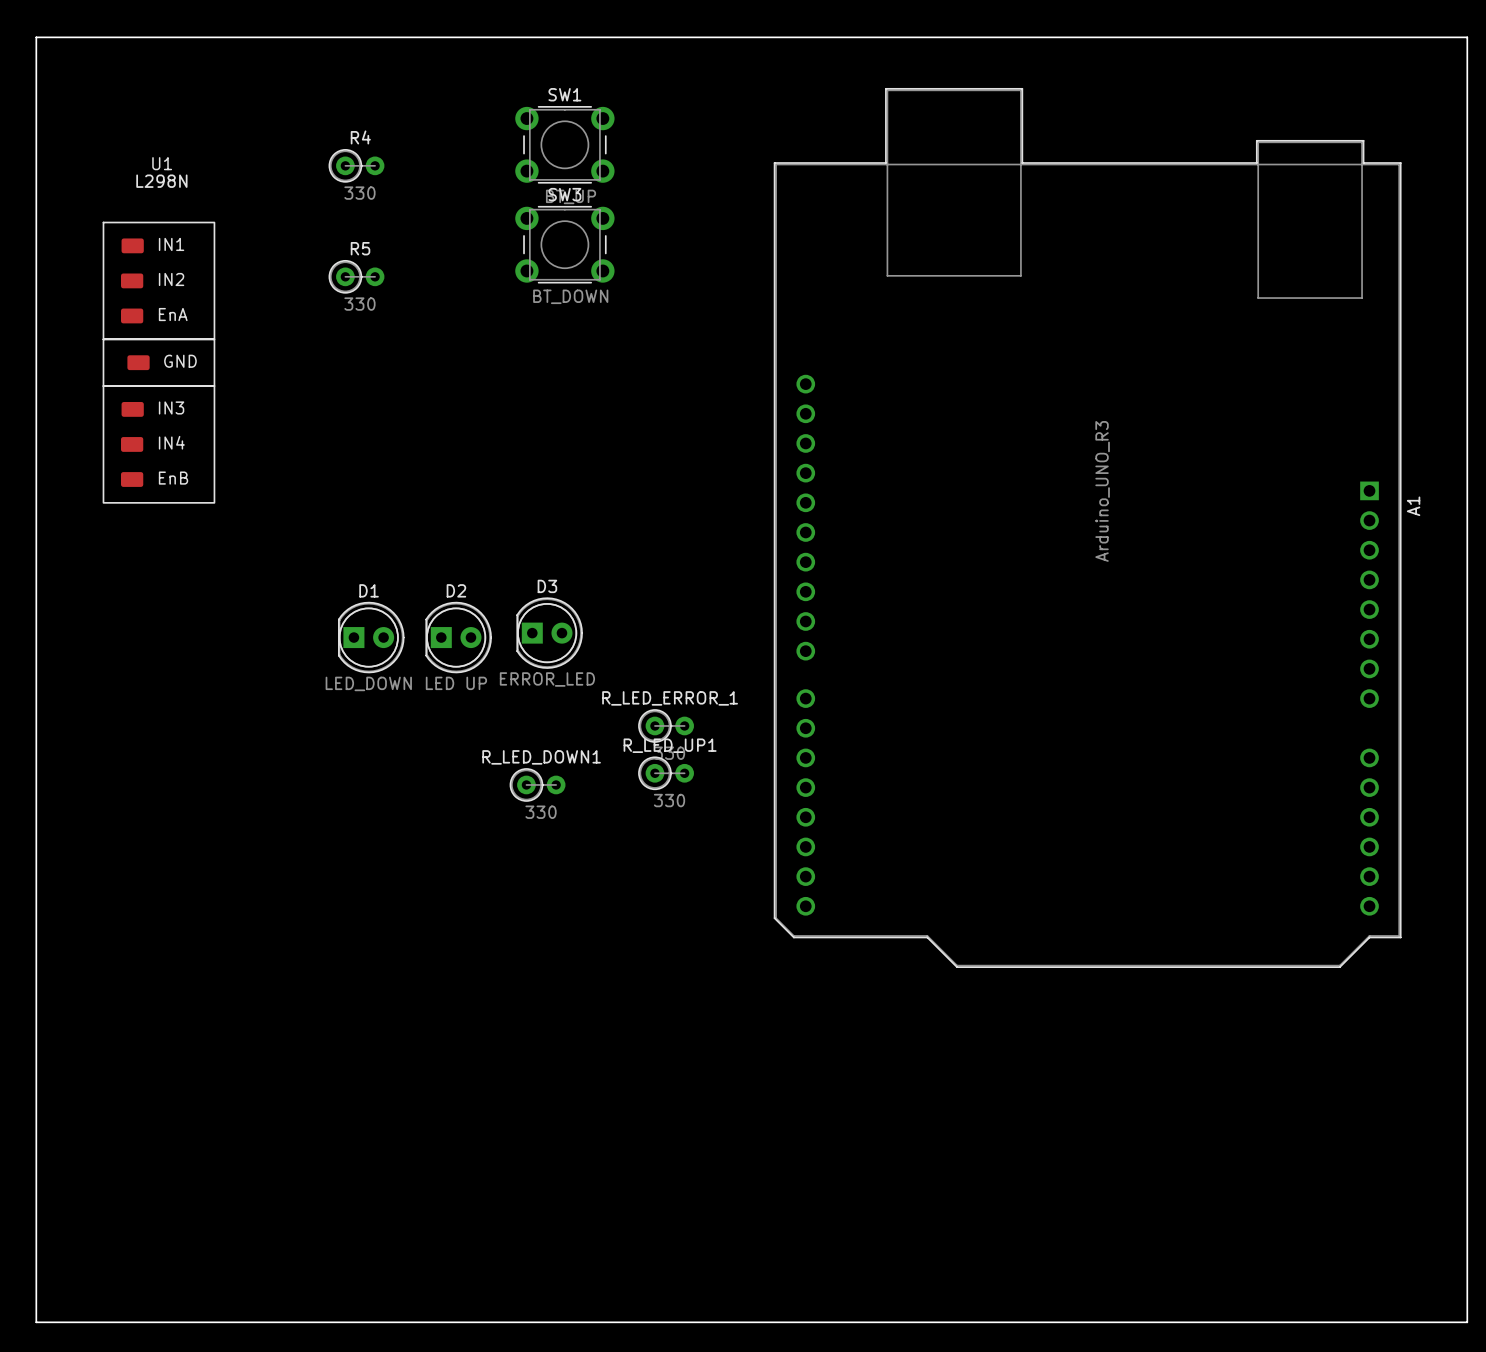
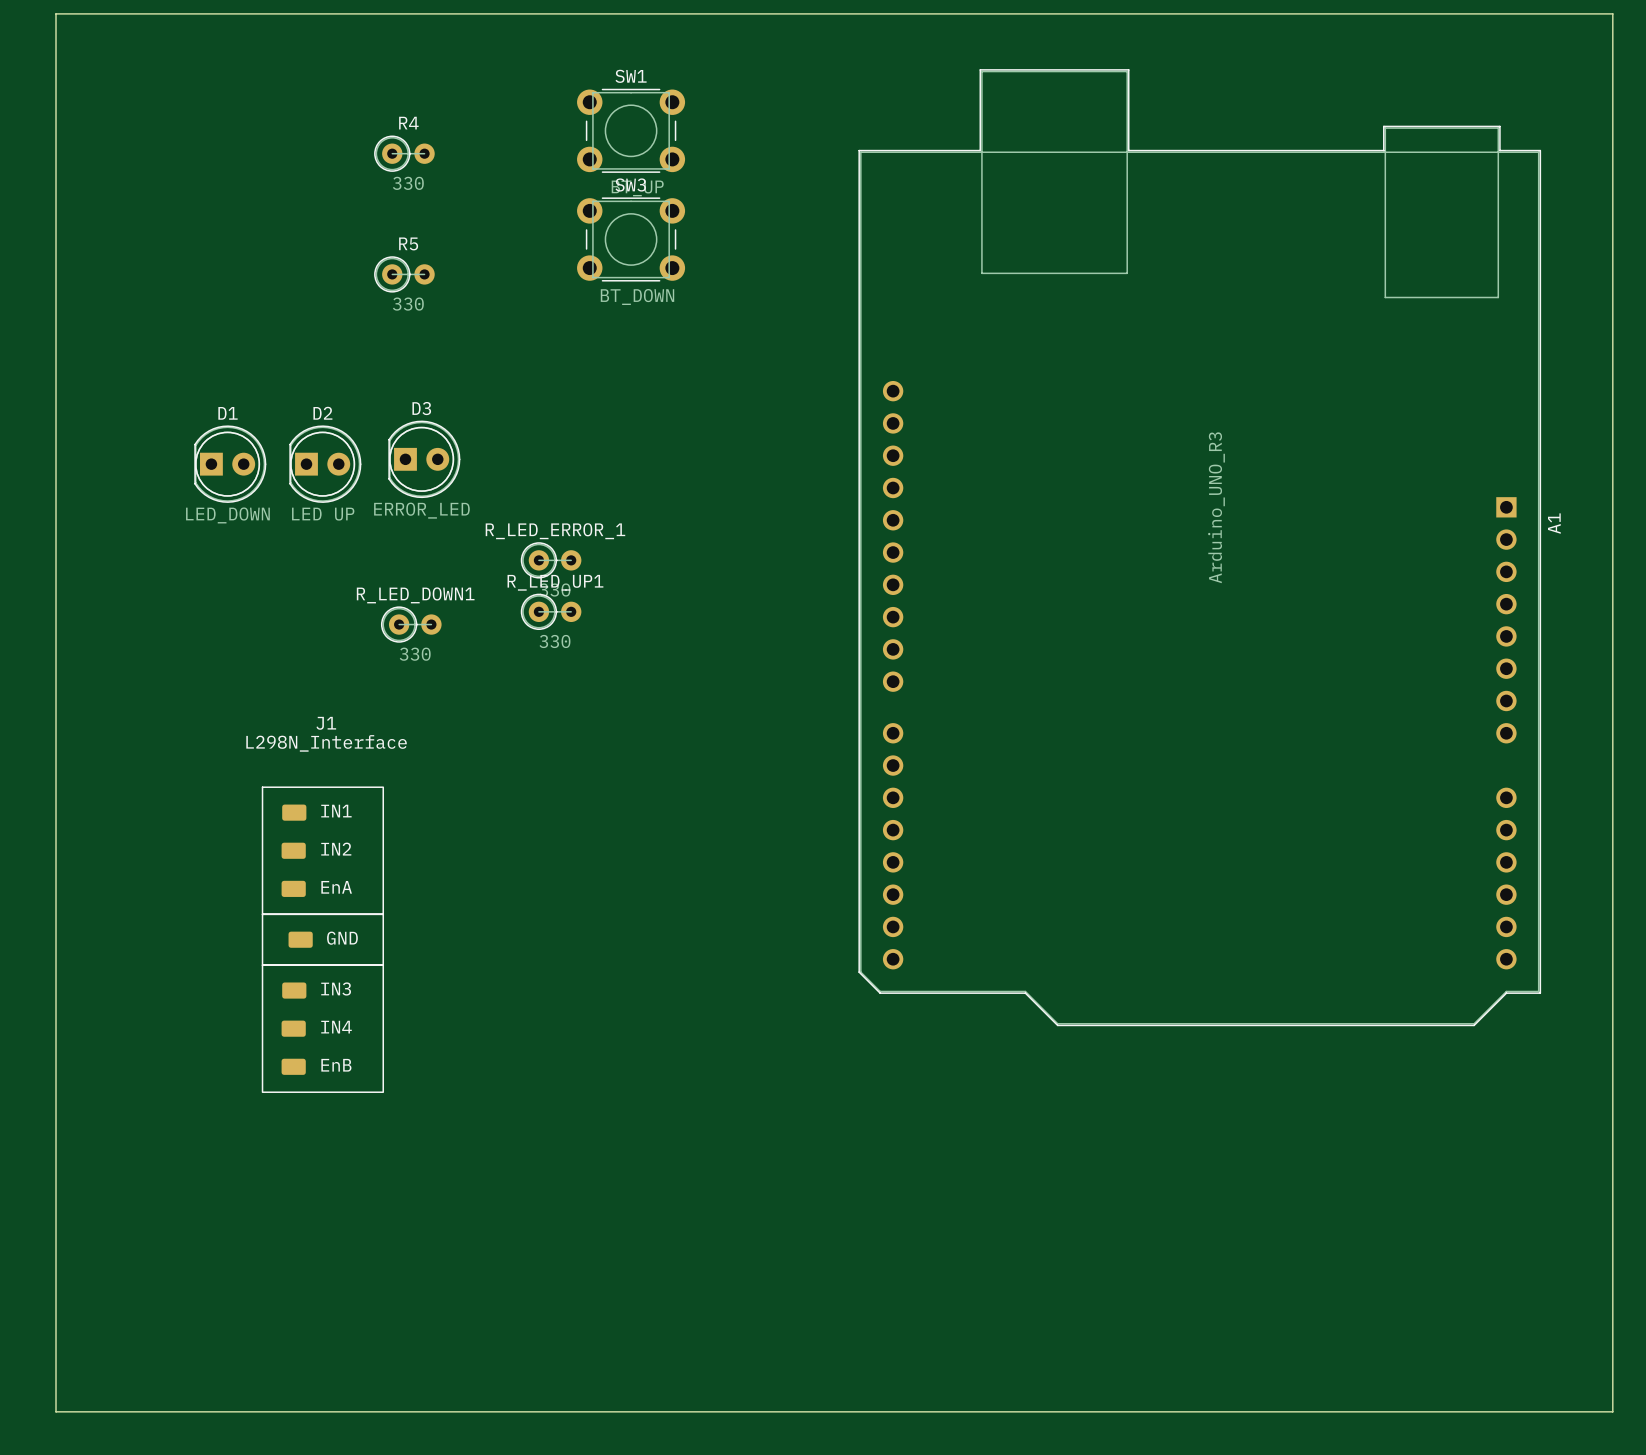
U1: L298N (158, 362) -> none
D3 position: (549, 633) -> (424, 459)
D1 position: (371, 637) -> (230, 464)
D2 position: (458, 637) -> (325, 464)
R_LED_ERROR_1 position: (666, 725) -> (551, 560)
R_LED_UP1 position: (666, 773) -> (551, 611)
R_LED_DOWN1 position: (537, 784) -> (411, 624)
J1: none -> L298N_Interface (322, 939)

